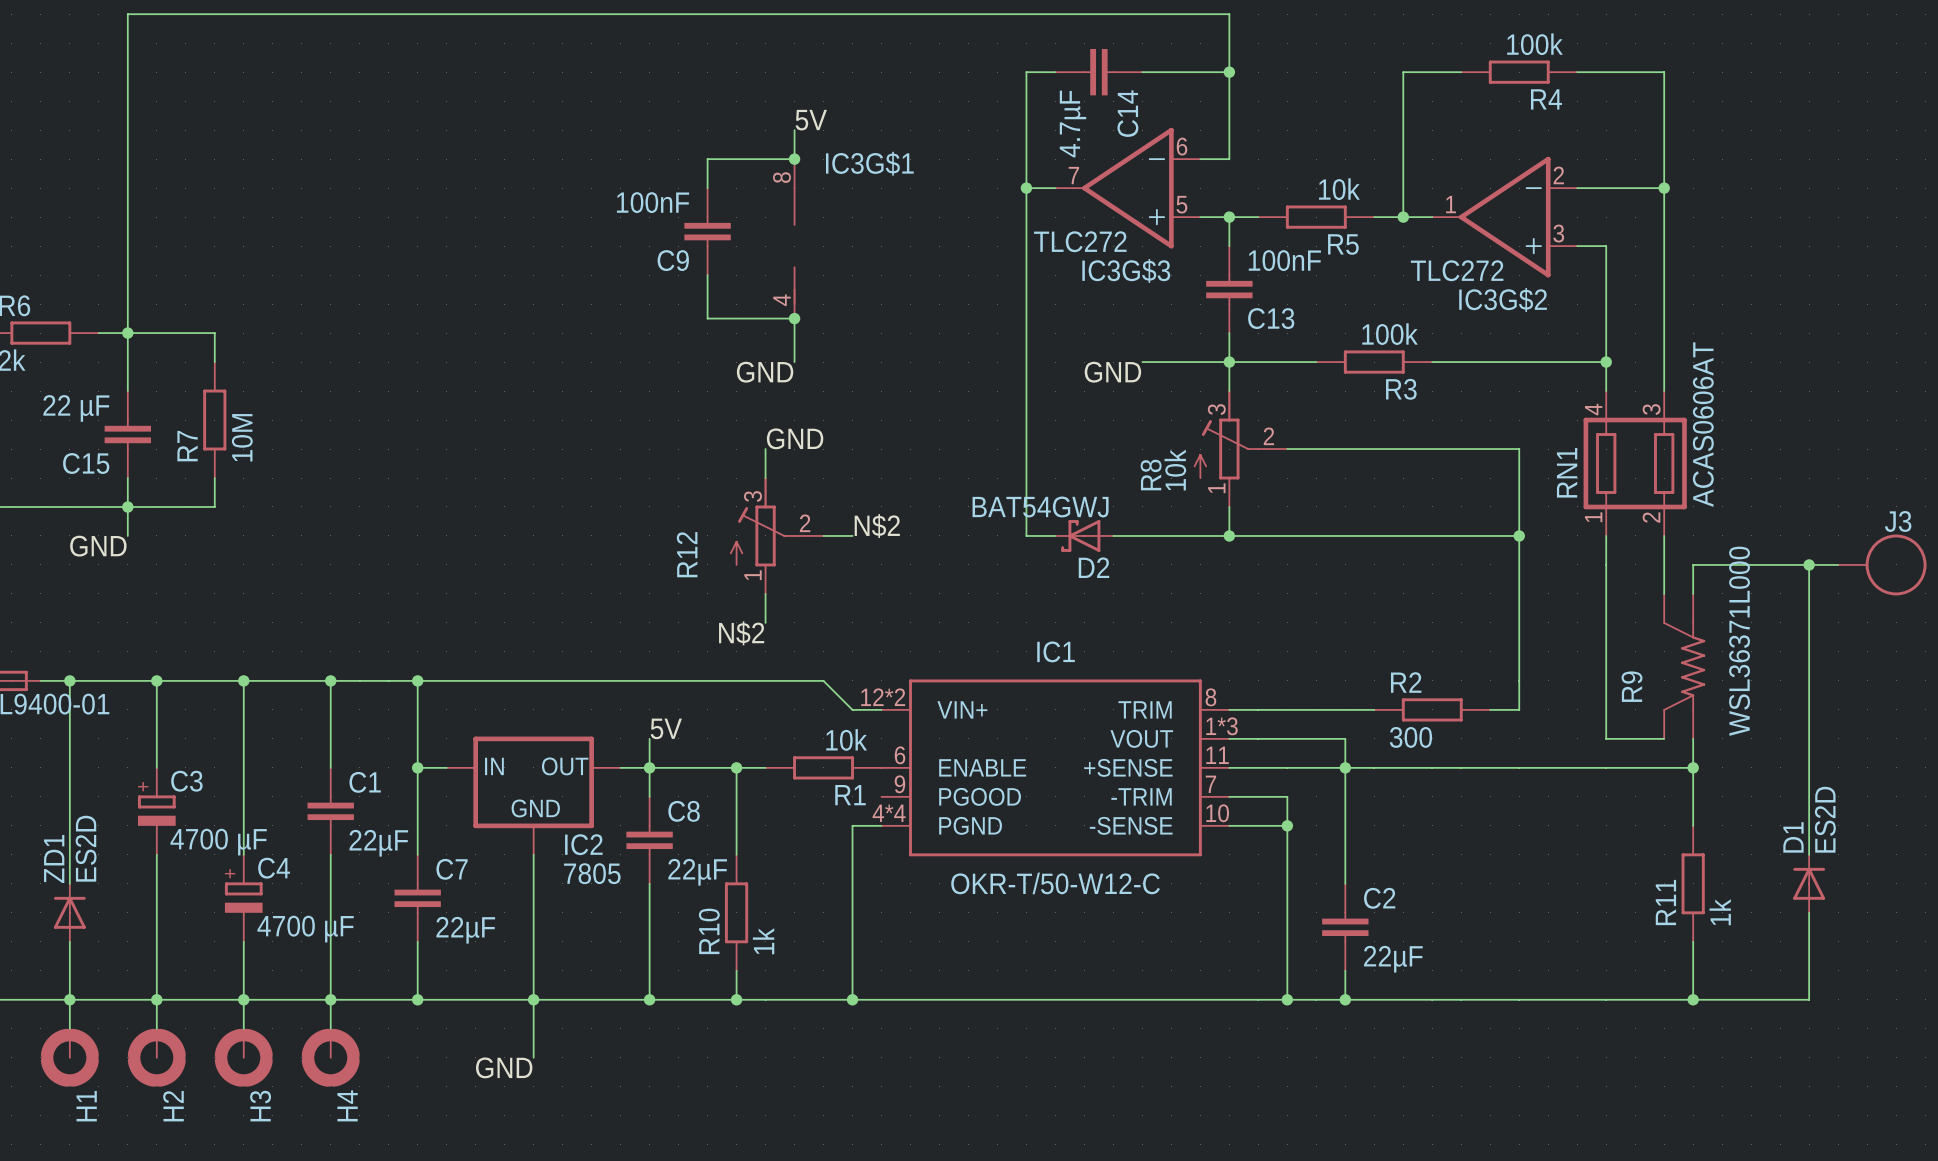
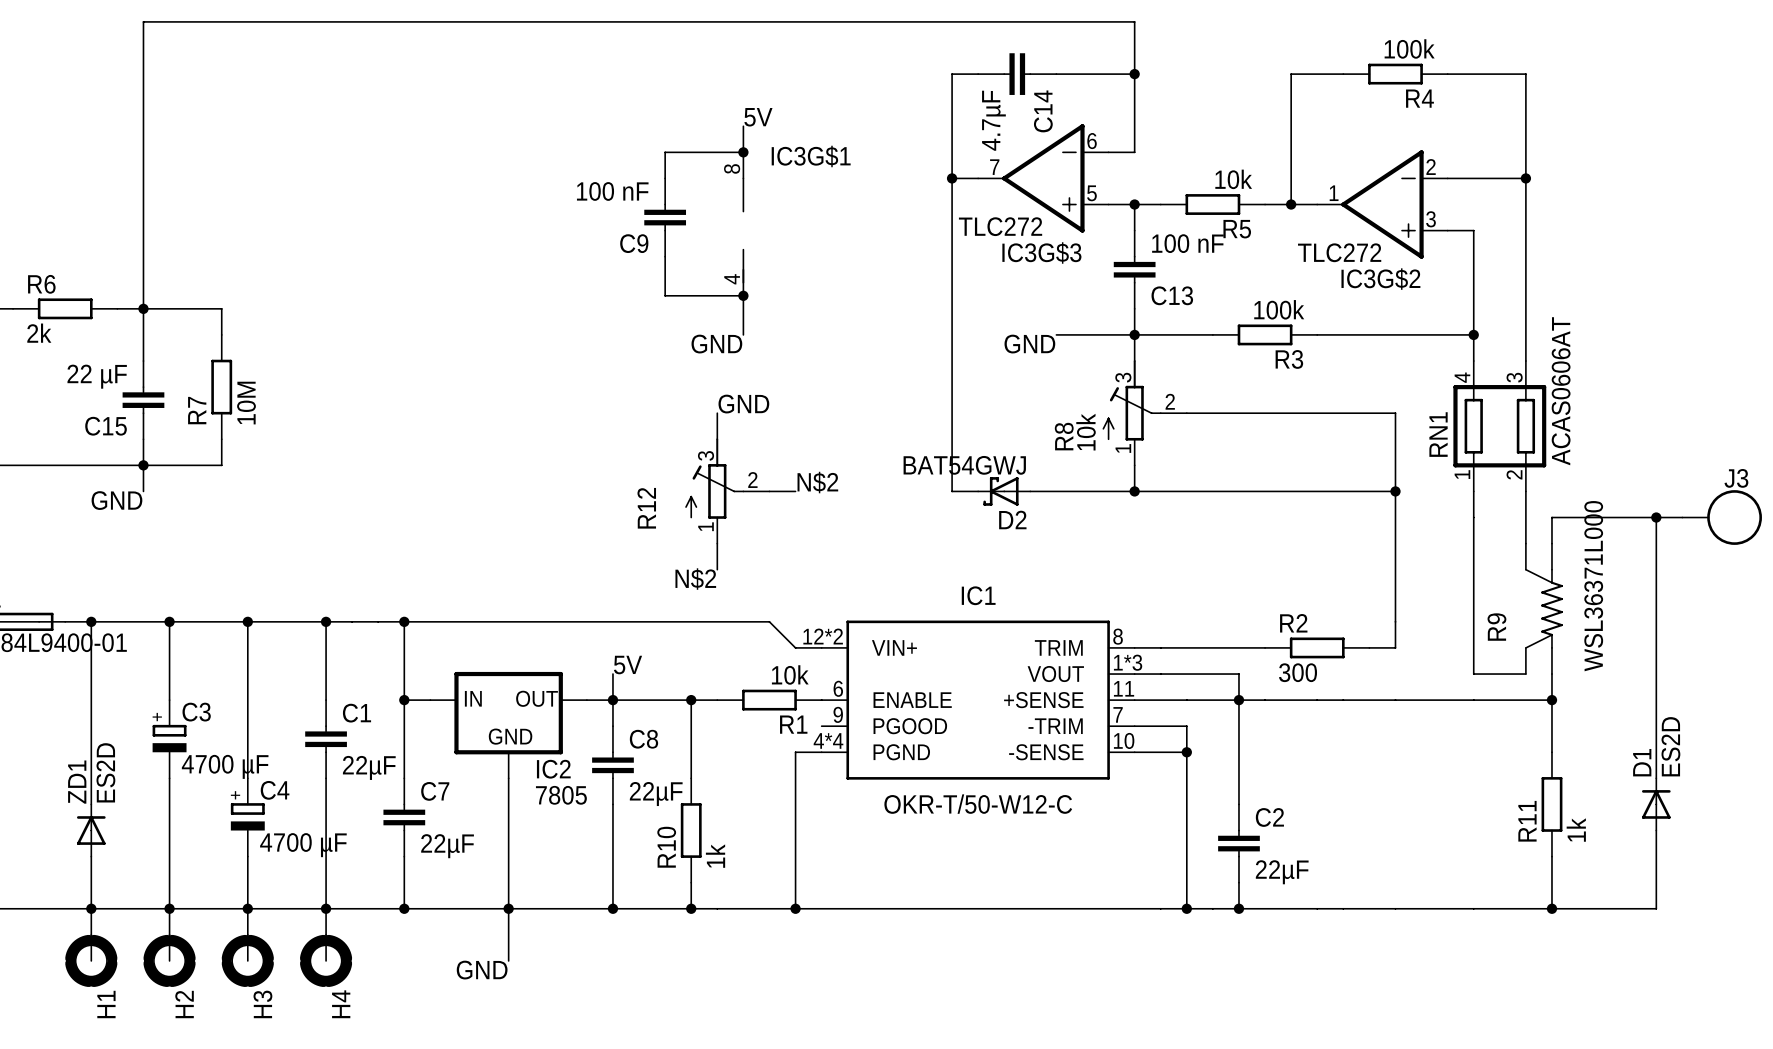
C9 value: 100nF (653, 202) -> 100 nF (612, 191)
C13 value: 100nF (1284, 260) -> 100 nF (1187, 243)

